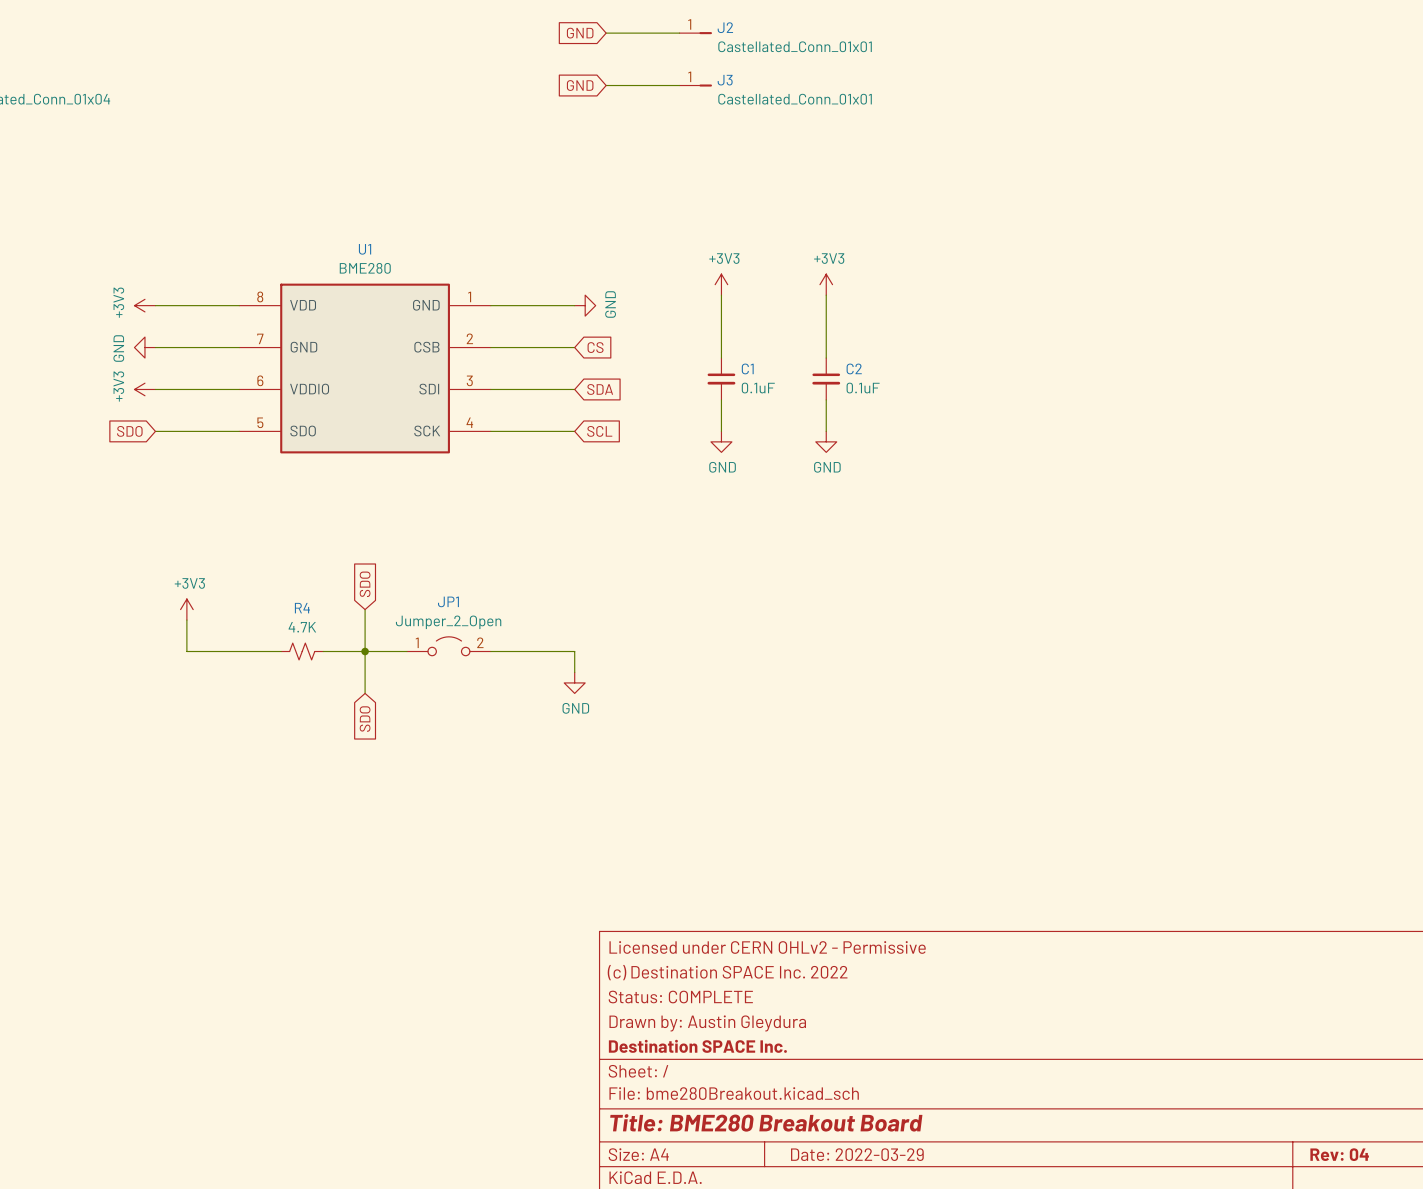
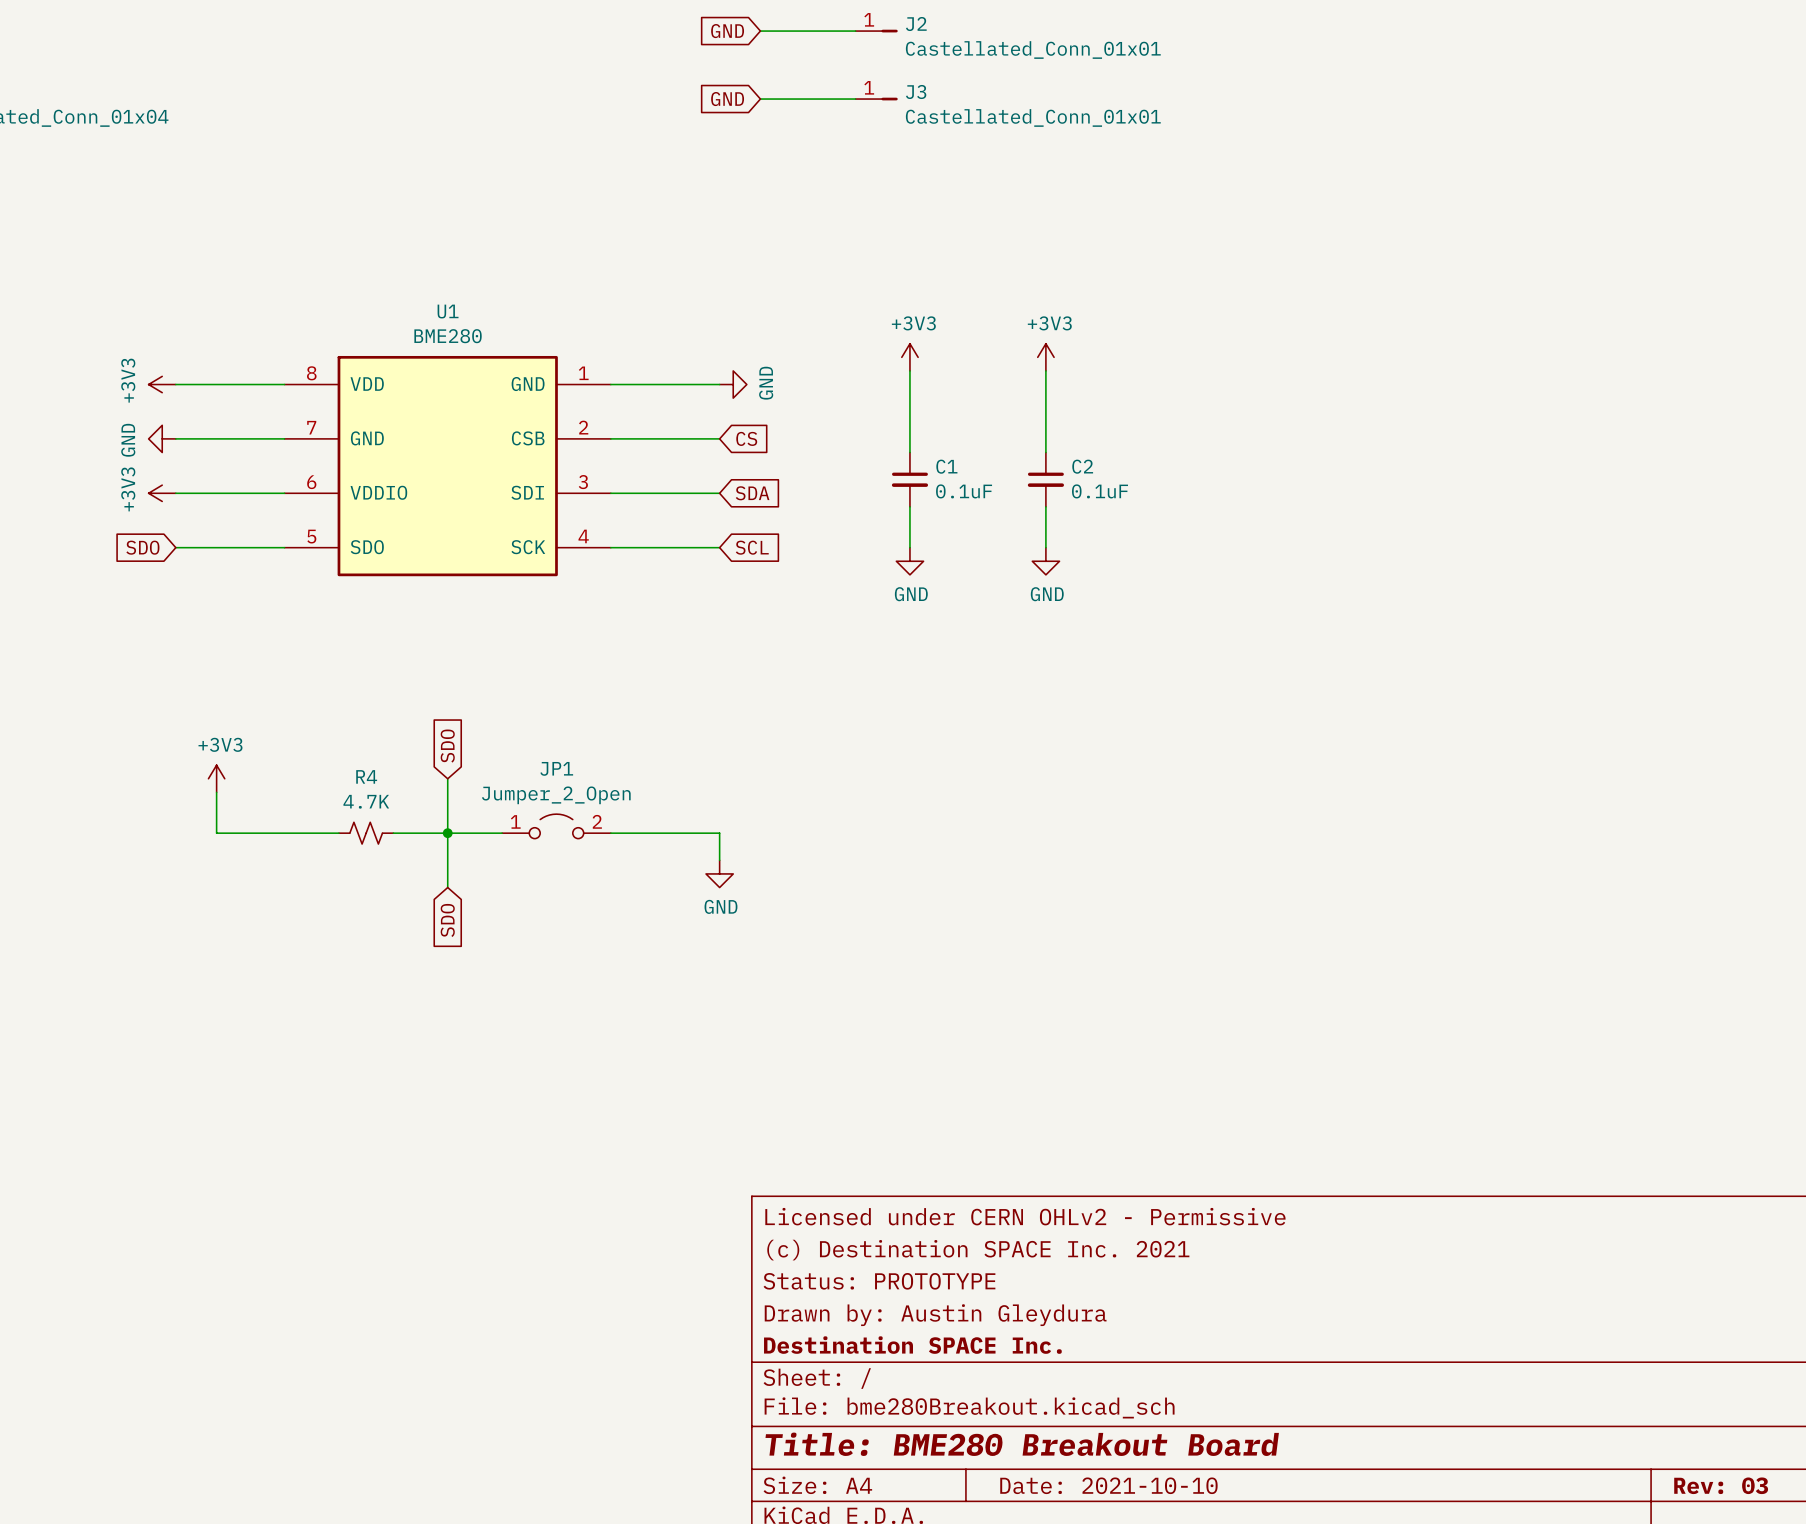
title block: (c) Destination SPACE Inc. 2022 (727, 972) -> (c) Destination SPACE Inc. 2021 (978, 1250)
title block: Status: COMPLETE (680, 997) -> Status: PROTOTYPE (879, 1281)
title block: Date: 2022-03-29 (857, 1154) -> Date: 2021-10-10 (1108, 1485)
title block: Rev: 04 (1339, 1154) -> Rev: 03 (1721, 1485)

